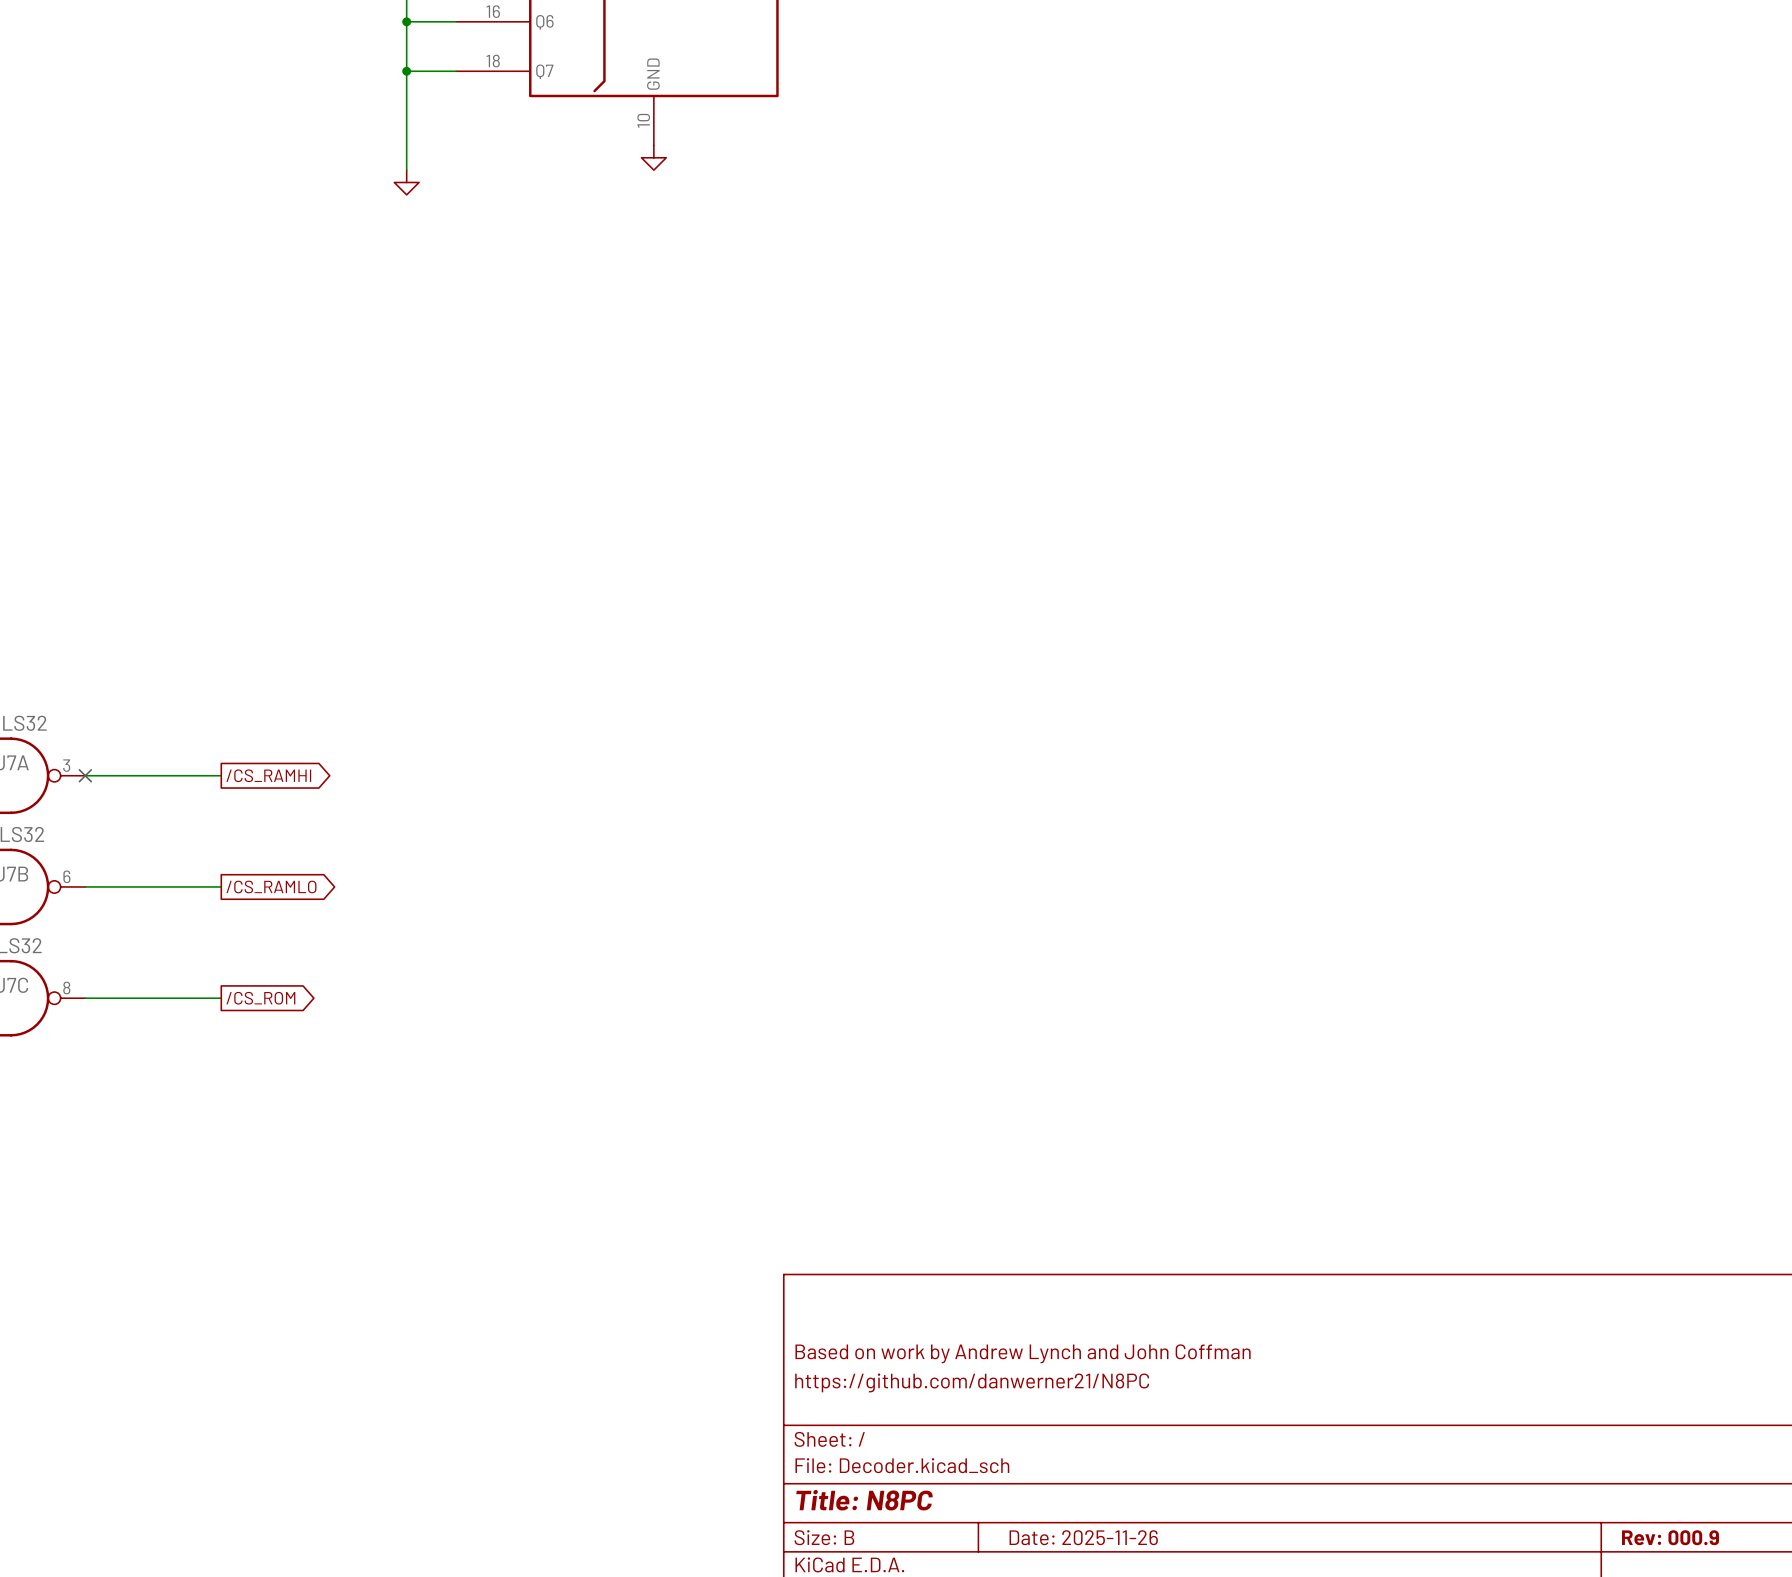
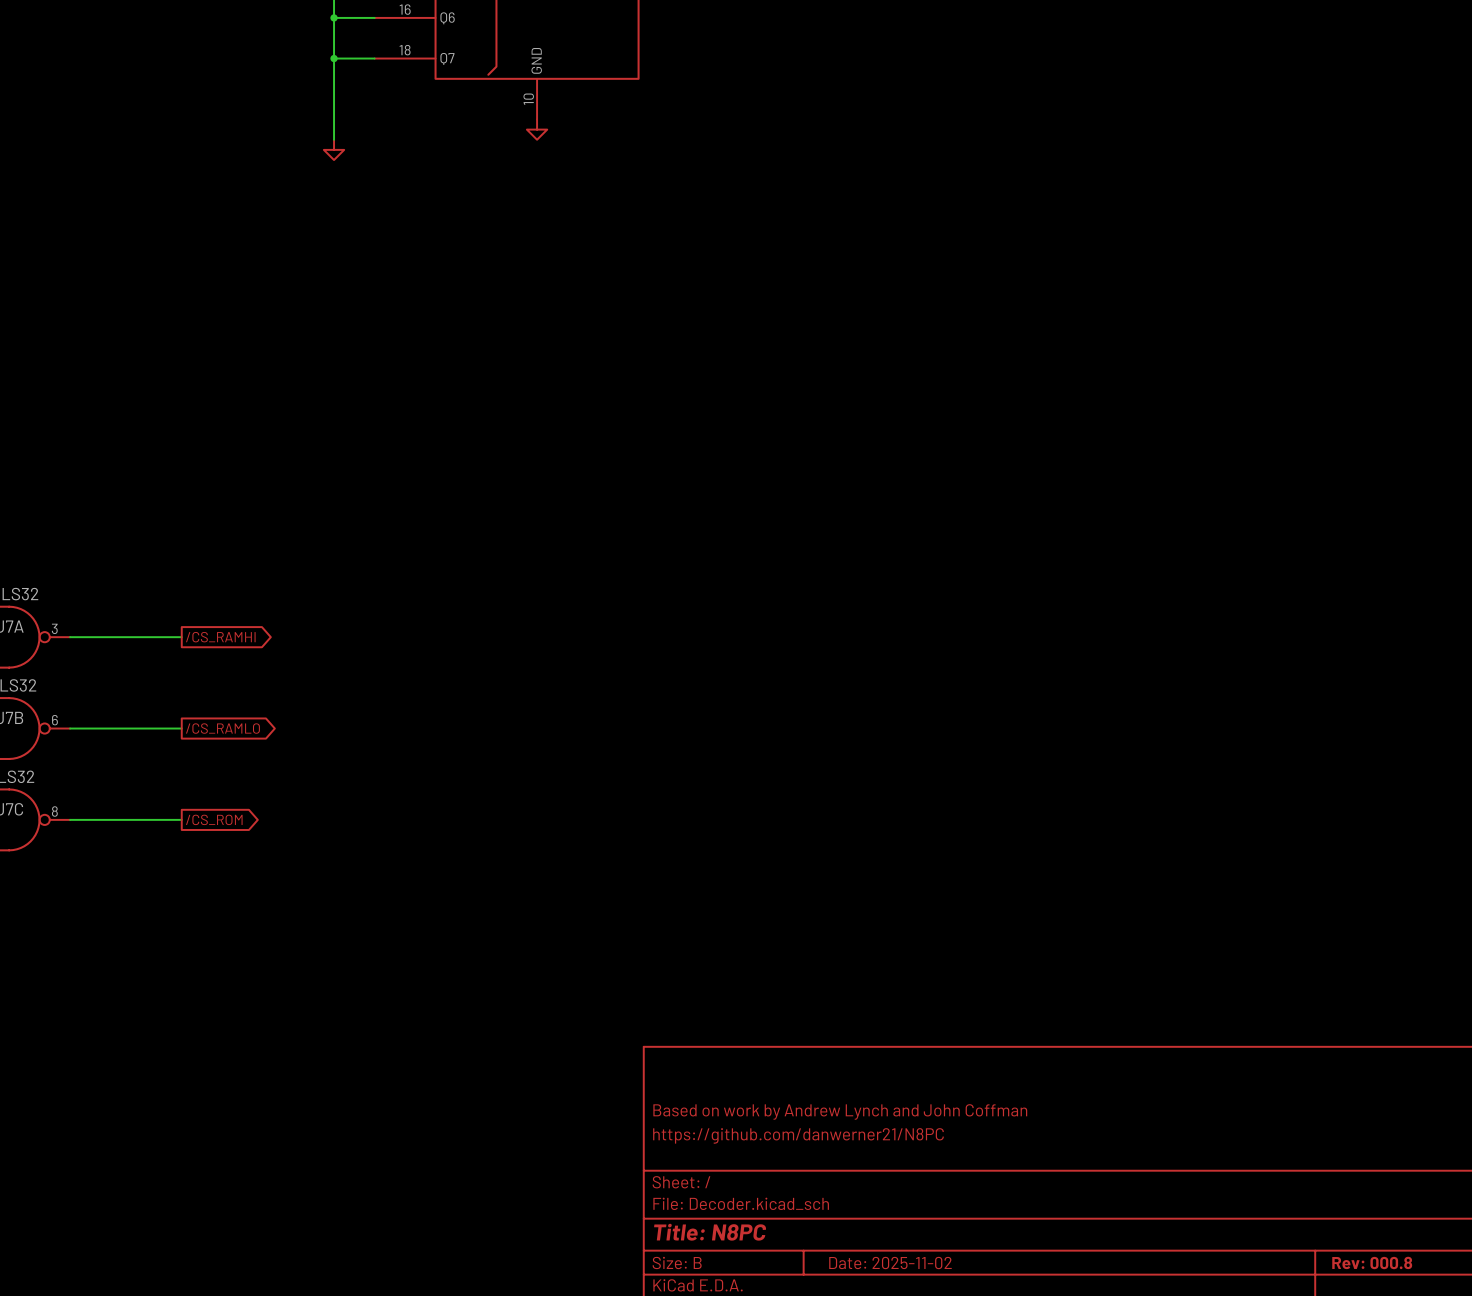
no-connect mark: (85, 775) -> none
title block: Date: 2025-11-26 (1083, 1537) -> Date: 2025-11-02 (890, 1263)
title block: Rev: 000.9 (1670, 1537) -> Rev: 000.8 (1372, 1262)

